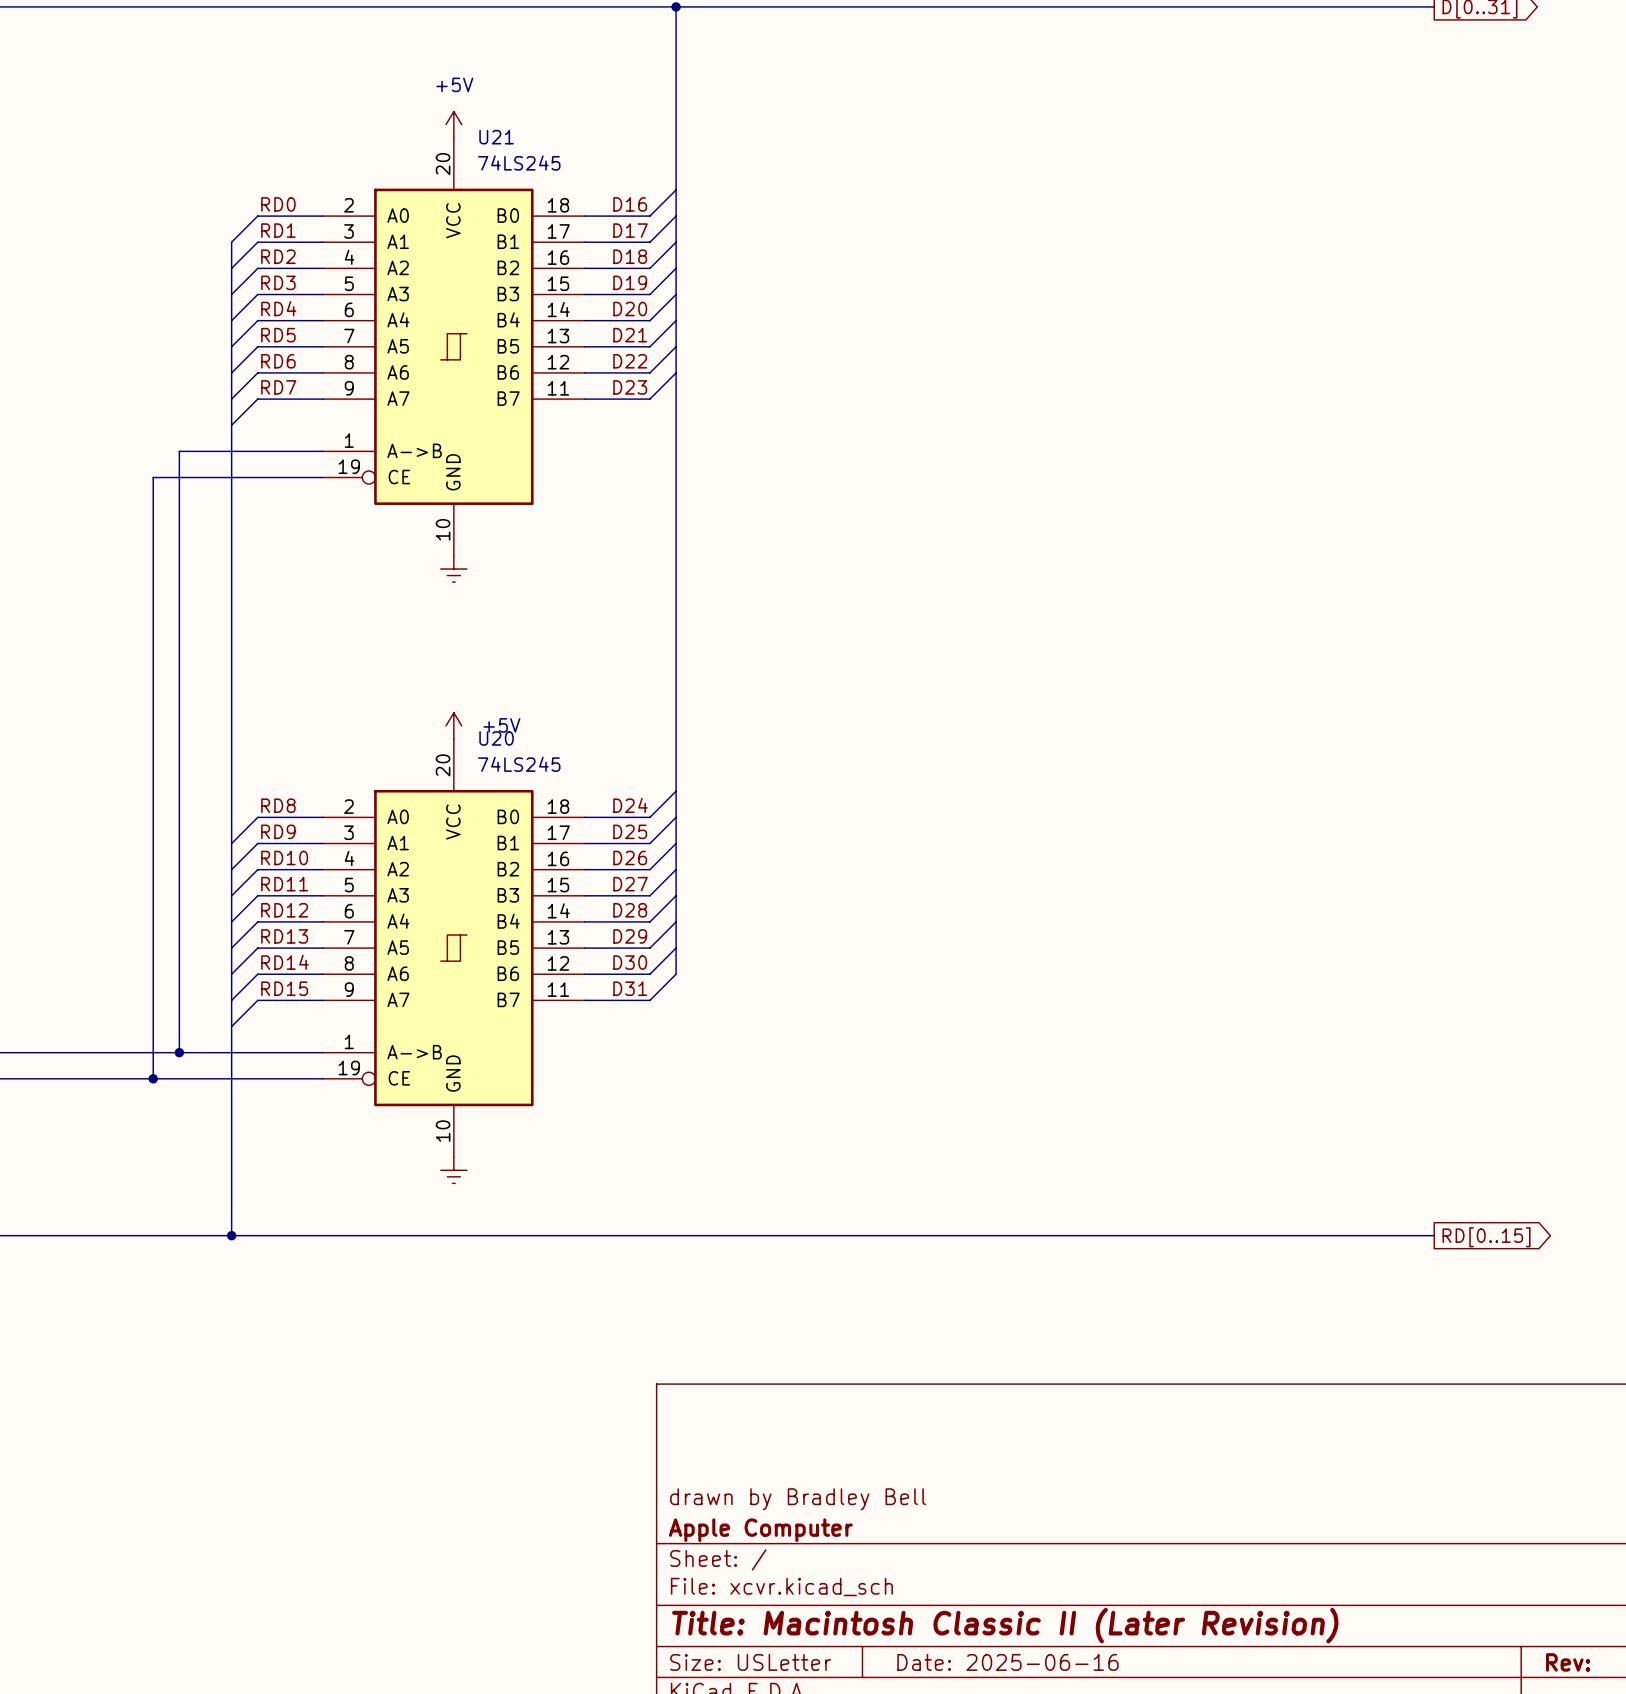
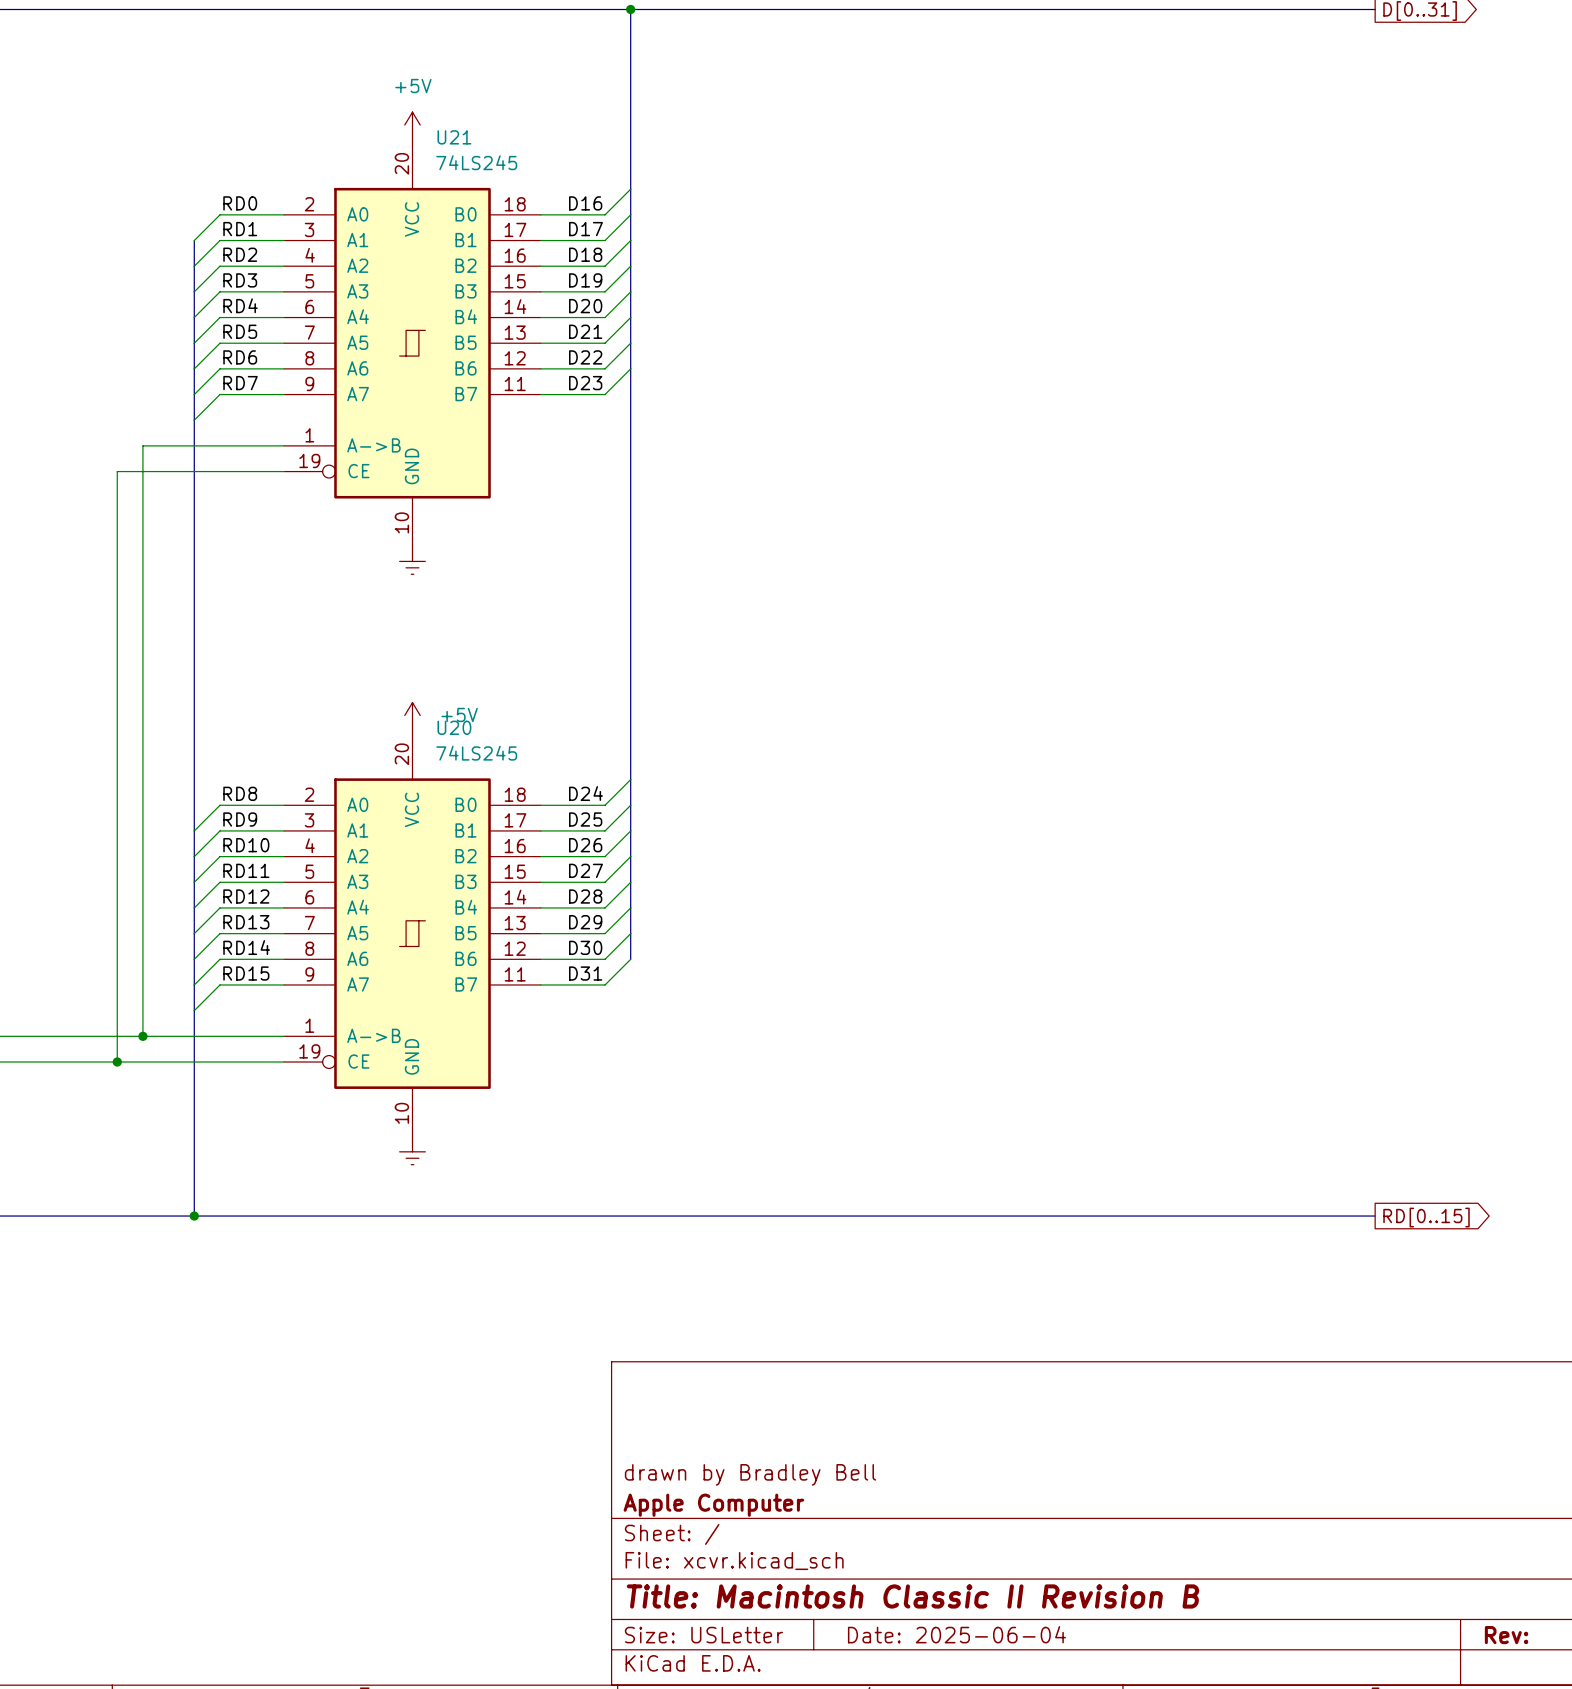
title block: Title: Macintosh Classic II (Later Revision) (1005, 1625) -> Title: Macintosh Classic II Revision B (913, 1596)
title block: Date: 2025-06-16 (1007, 1662) -> Date: 2025-06-04 (956, 1634)

